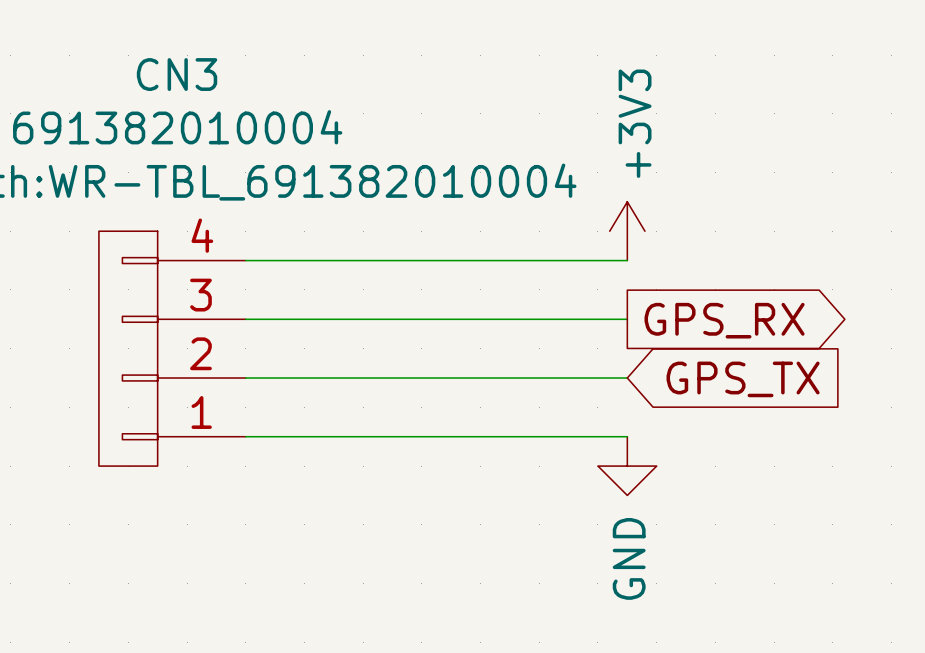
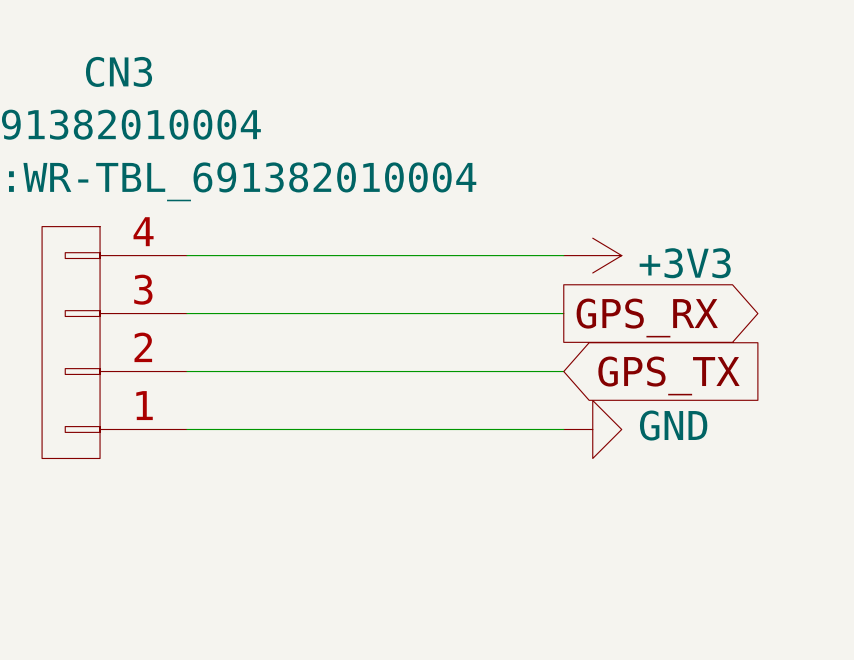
power symbol rotation: 0° (627, 231) -> 90° clockwise (592, 255)
power symbol position: +3V3 (627, 231) -> +3V3 (592, 255)
power symbol rotation: 0° (627, 466) -> 90° counterclockwise (592, 429)
power symbol position: GND (627, 466) -> GND (592, 429)

